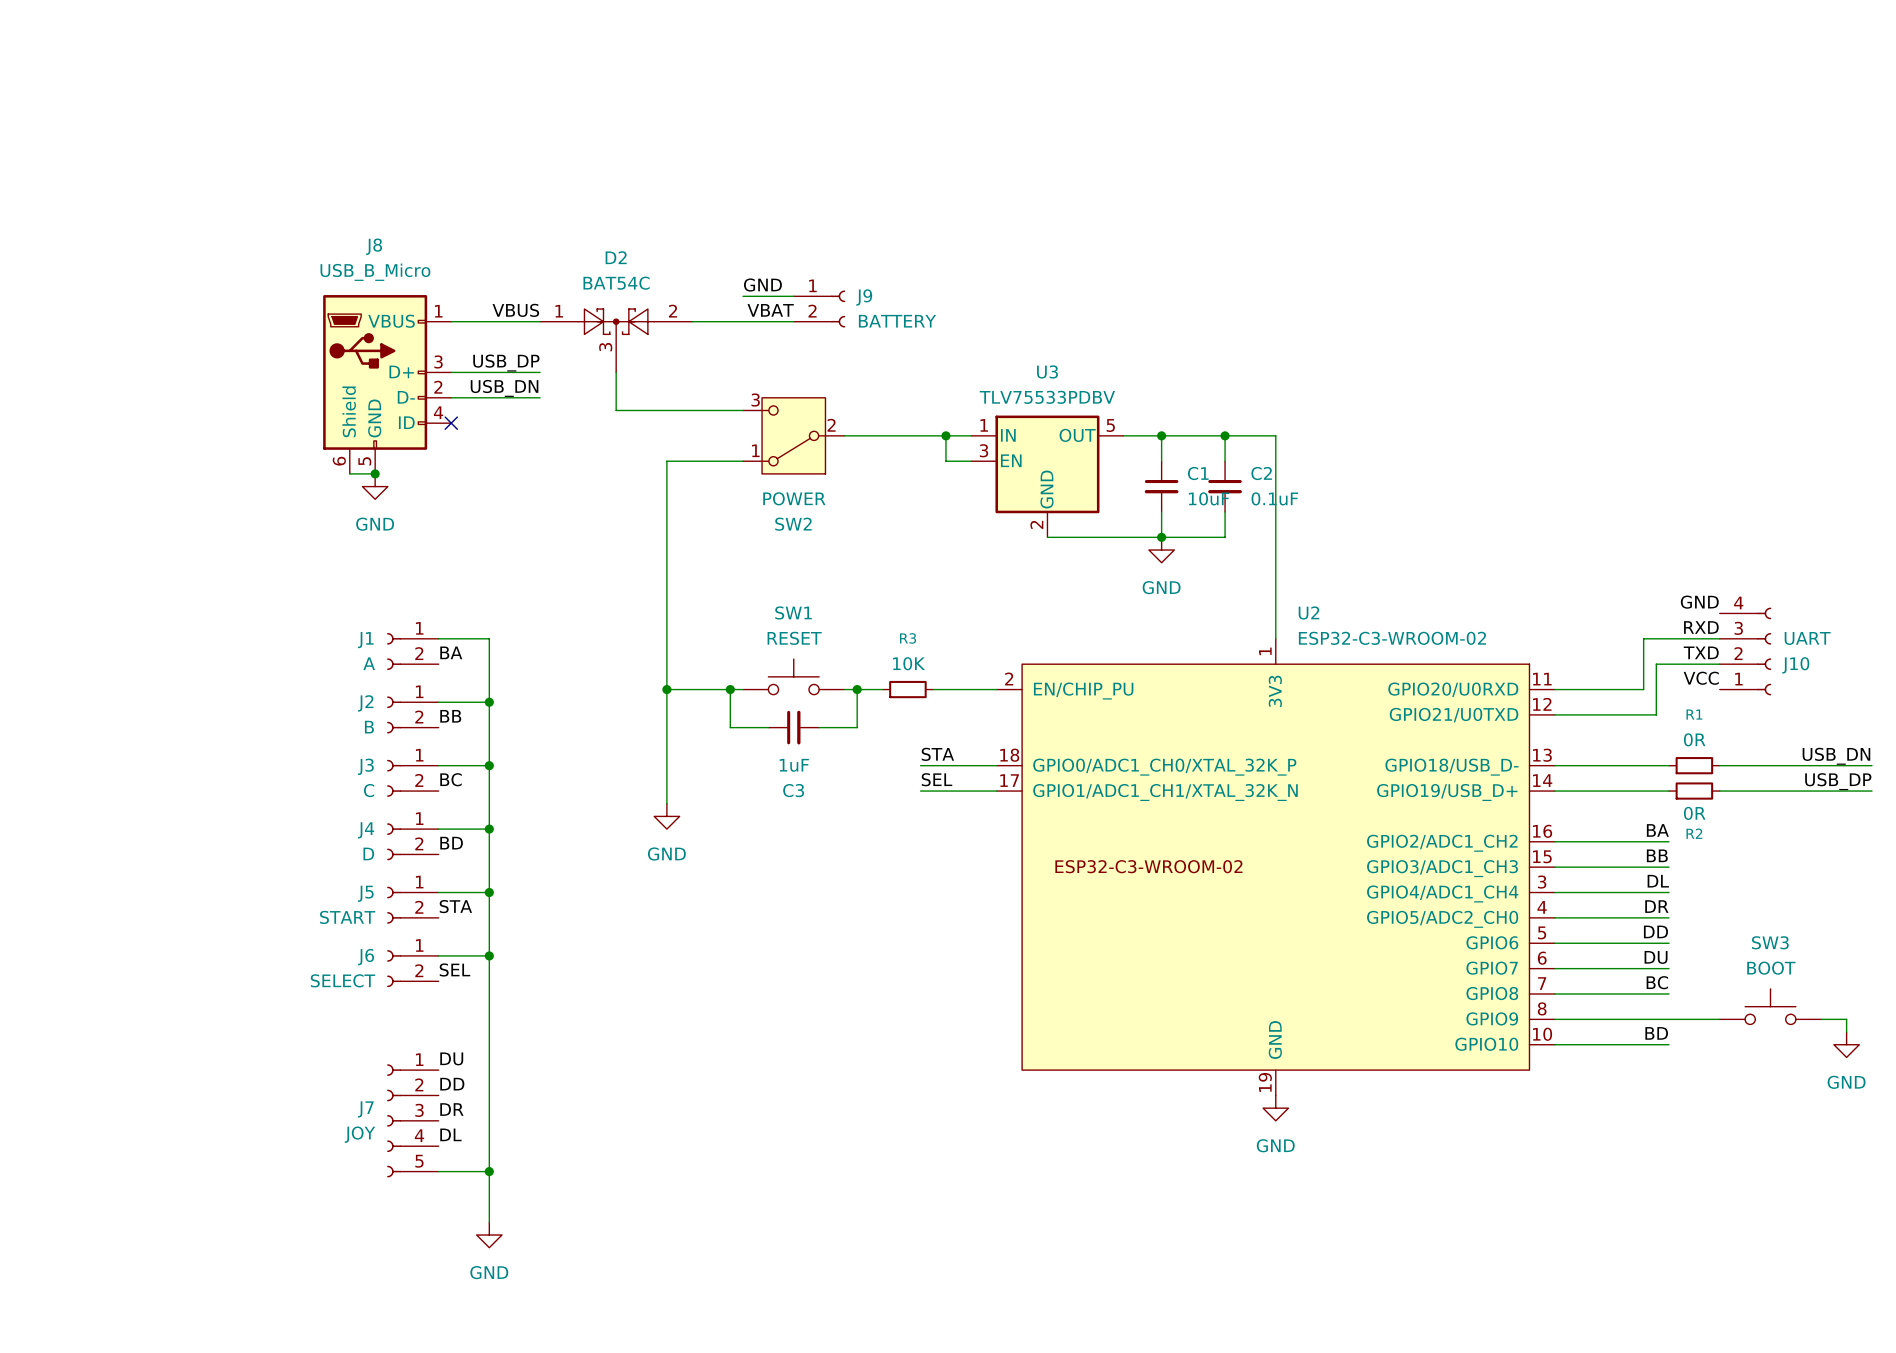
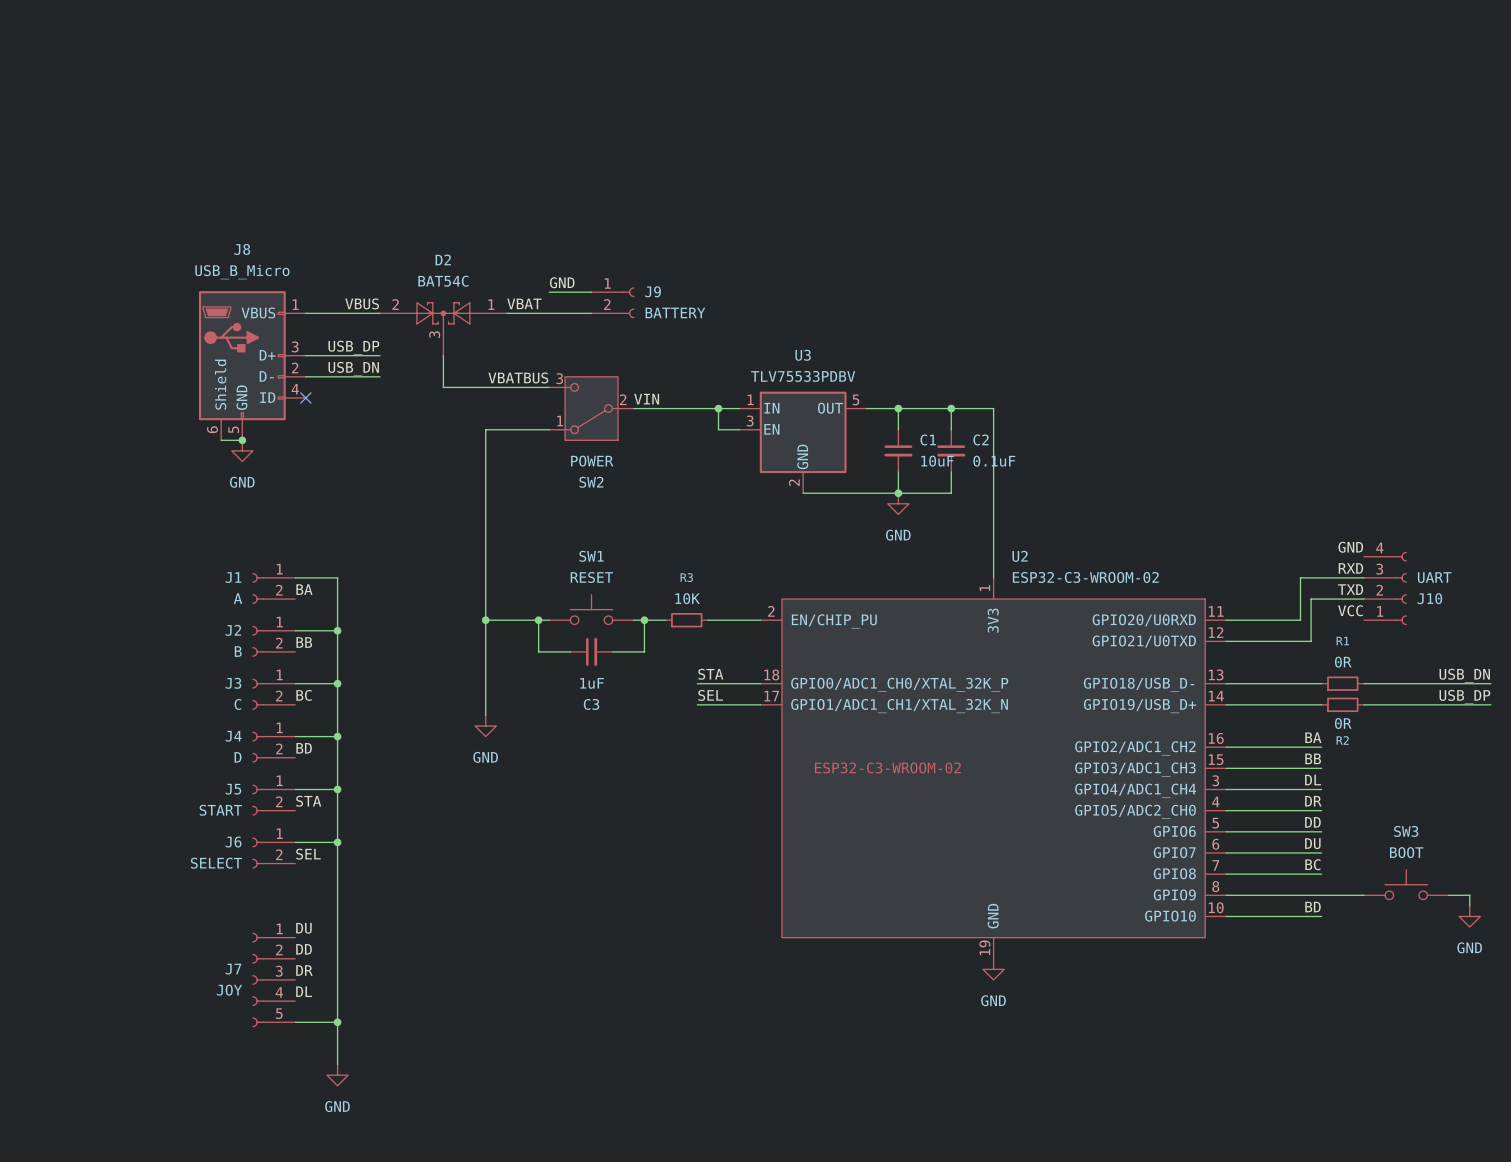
label position: VBAT (770, 310) -> VBAT (524, 303)
D2 flip: as is (616, 321) -> left-right (443, 313)
label: none -> VBATBUS (518, 377)
label: none -> VIN (646, 399)

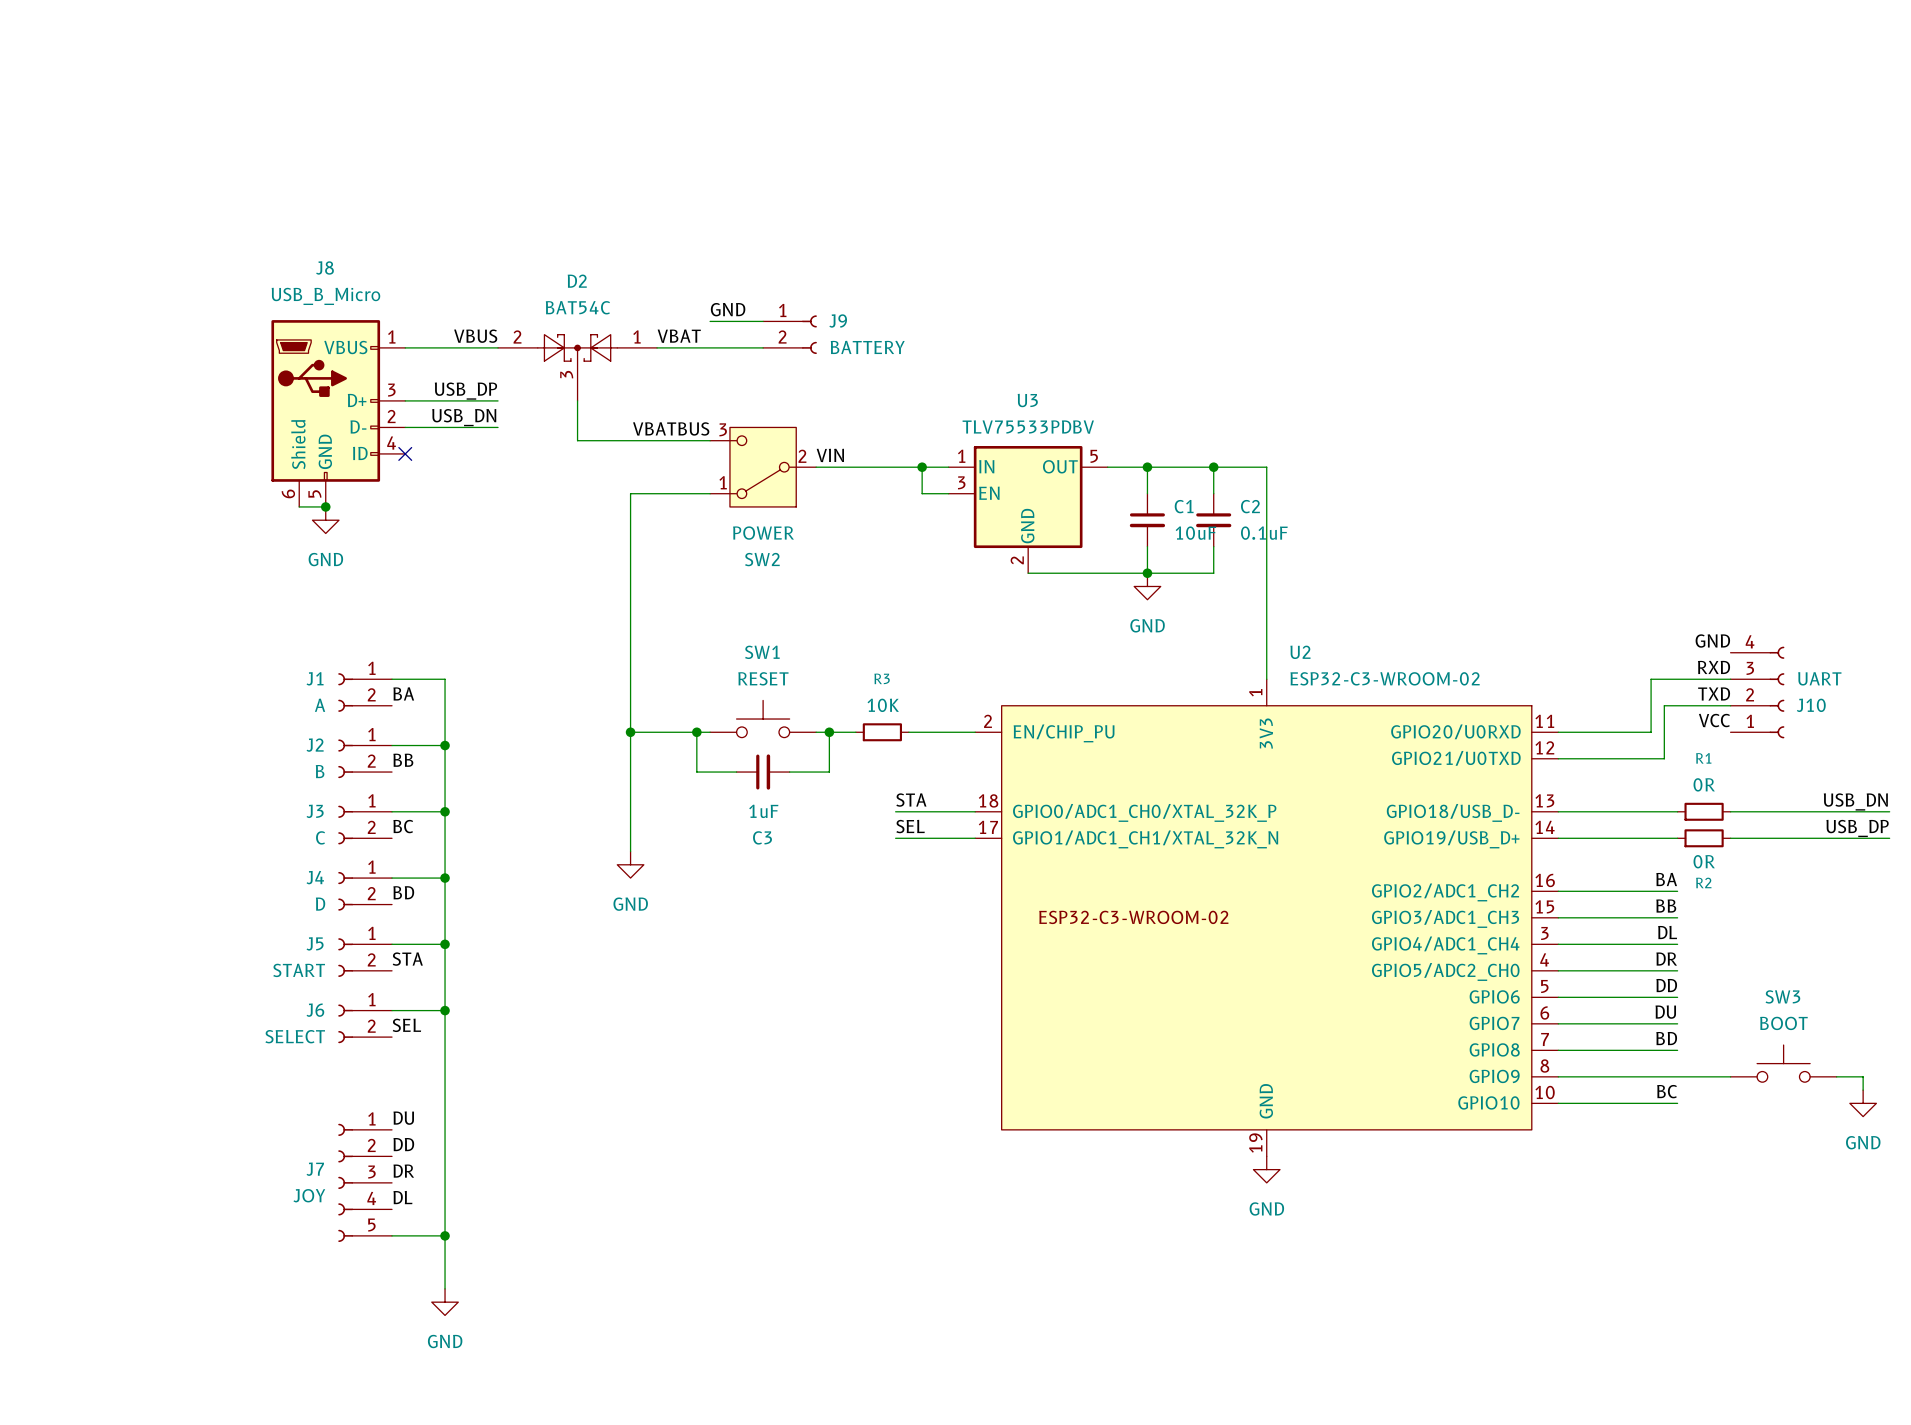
label: BC (1312, 864) -> BD (1666, 1038)
label: BD (1313, 907) -> BC (1667, 1091)

